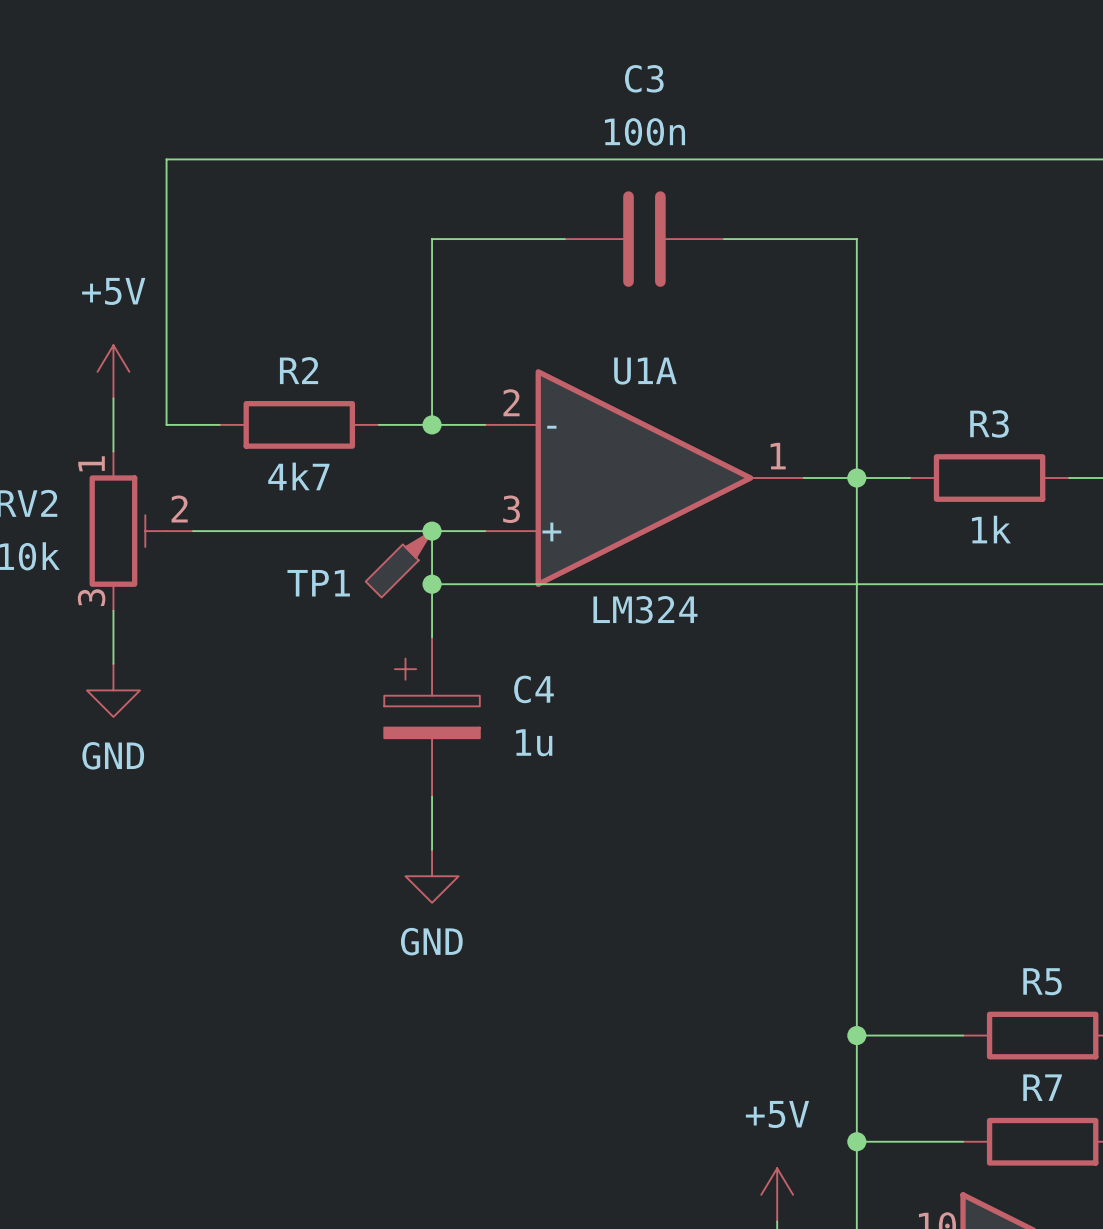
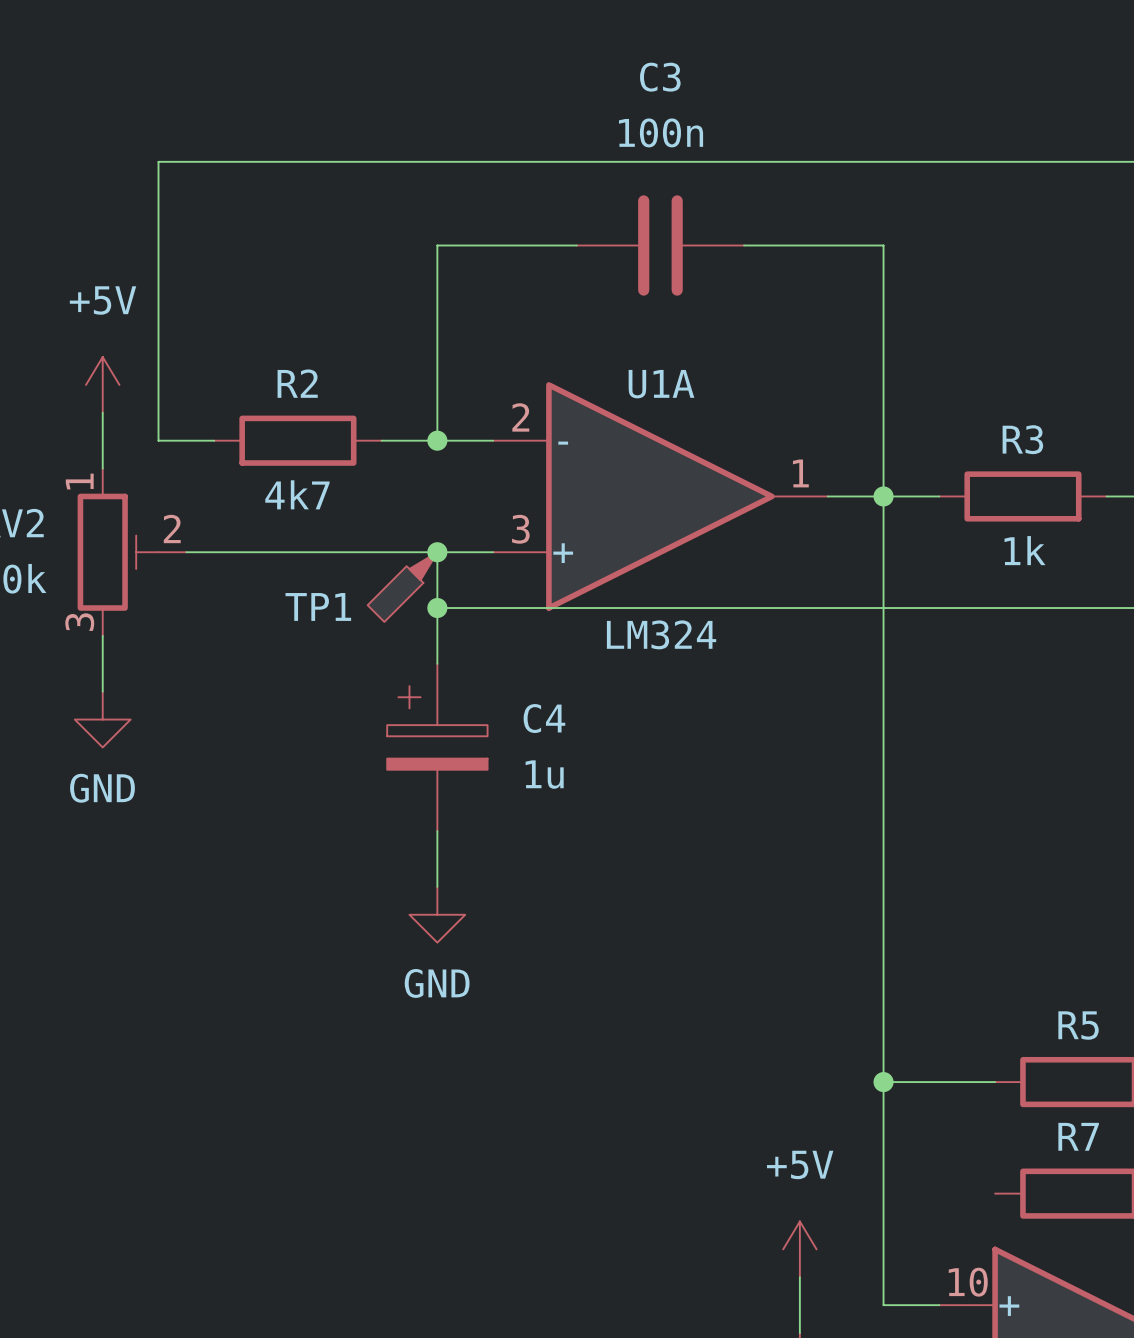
wire: (856, 1141) (963, 1141) -> none
junction: (856, 1141) -> none

